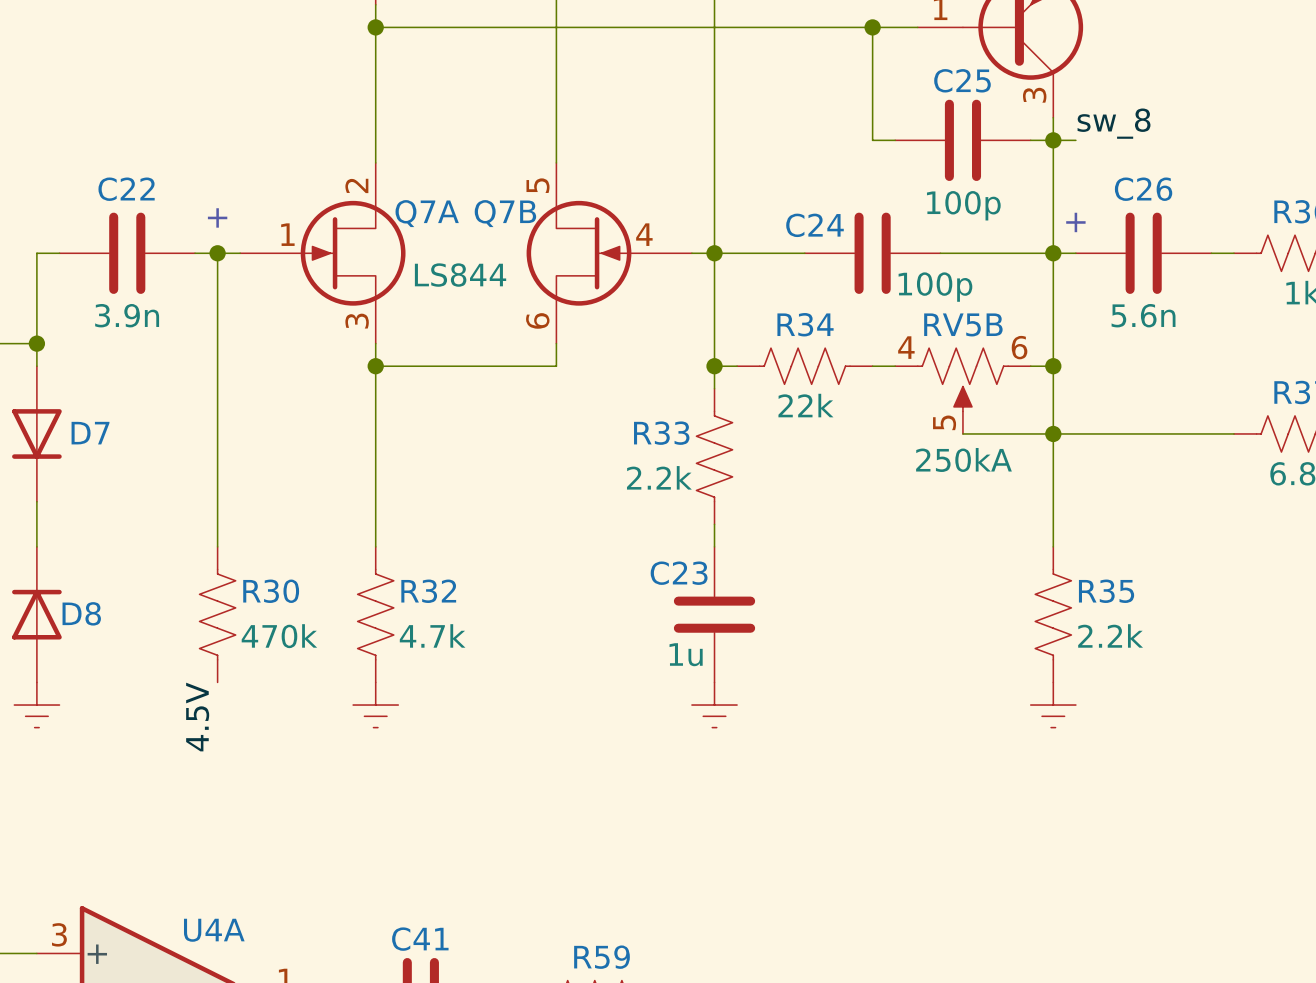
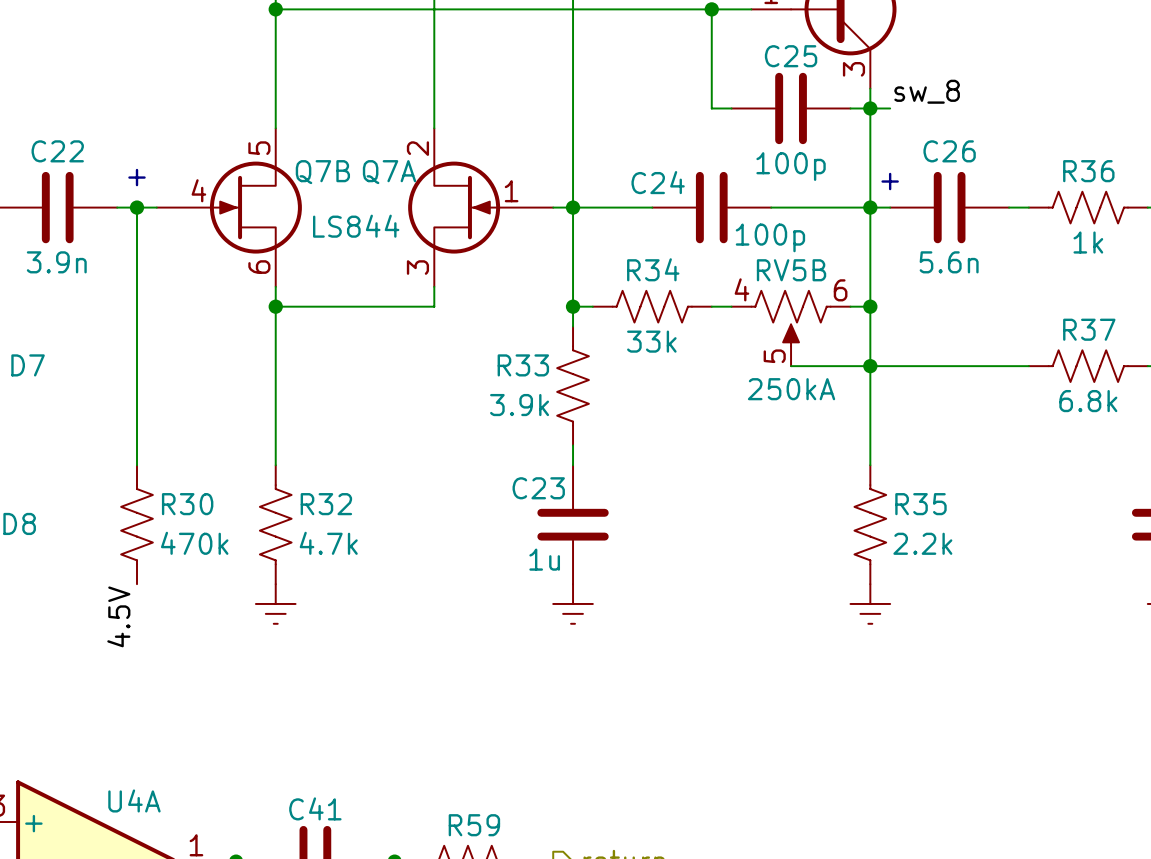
Q7A position: (322, 253) -> (480, 207)
Q7A flip: as is (353, 253) -> left-right (454, 207)
Q7B flip: as is (578, 253) -> left-right (255, 207)
Q7B position: (609, 253) -> (229, 207)
R34 value: 22k (805, 405) -> 33k (651, 341)
R33 value: 2.2k (659, 477) -> 3.9k (519, 405)

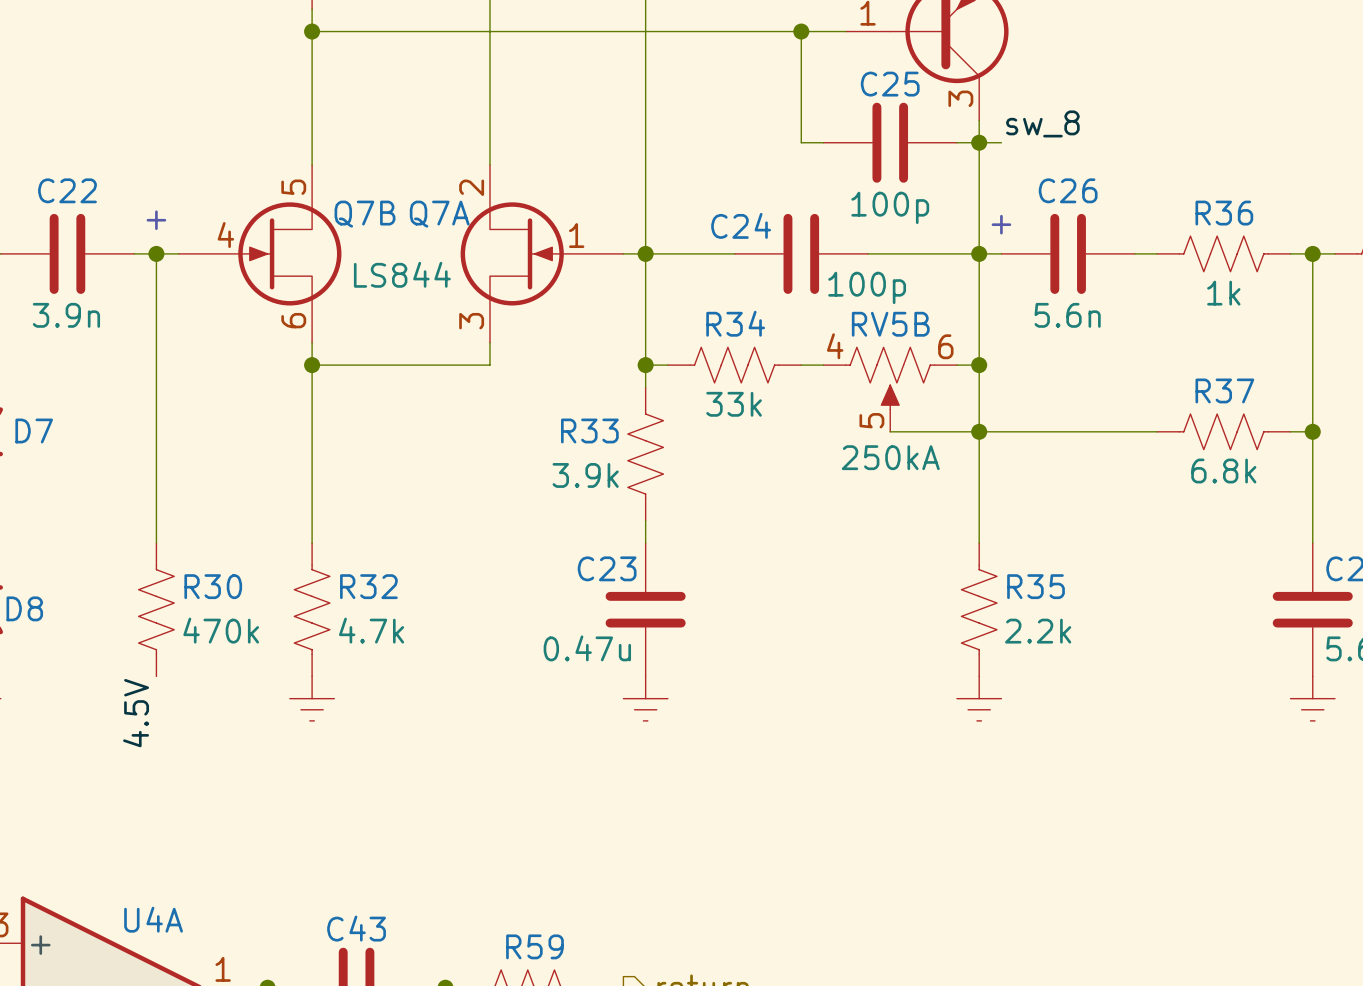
C23 value: 1u (544, 559) -> 0.47u (587, 648)
C41 name: C41 (315, 808) -> C43 (356, 928)

